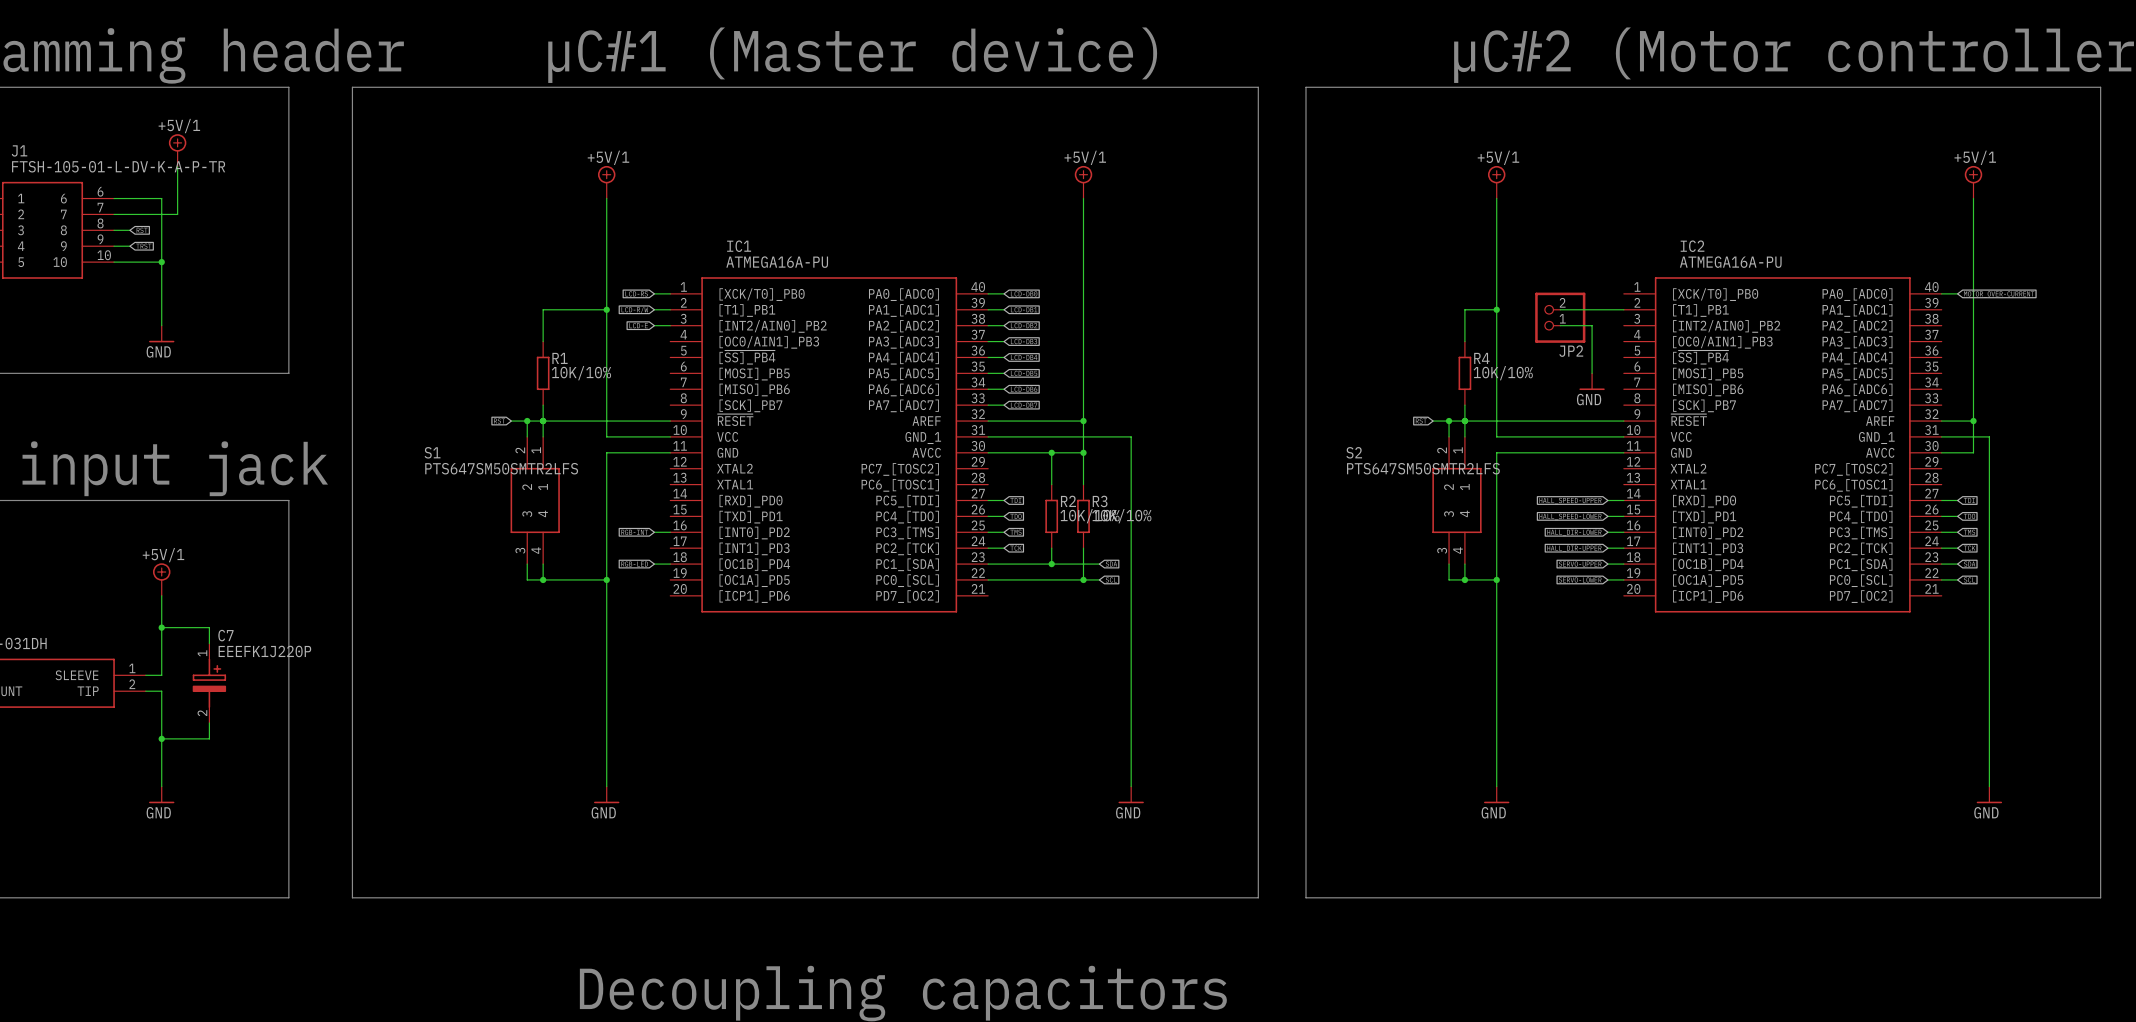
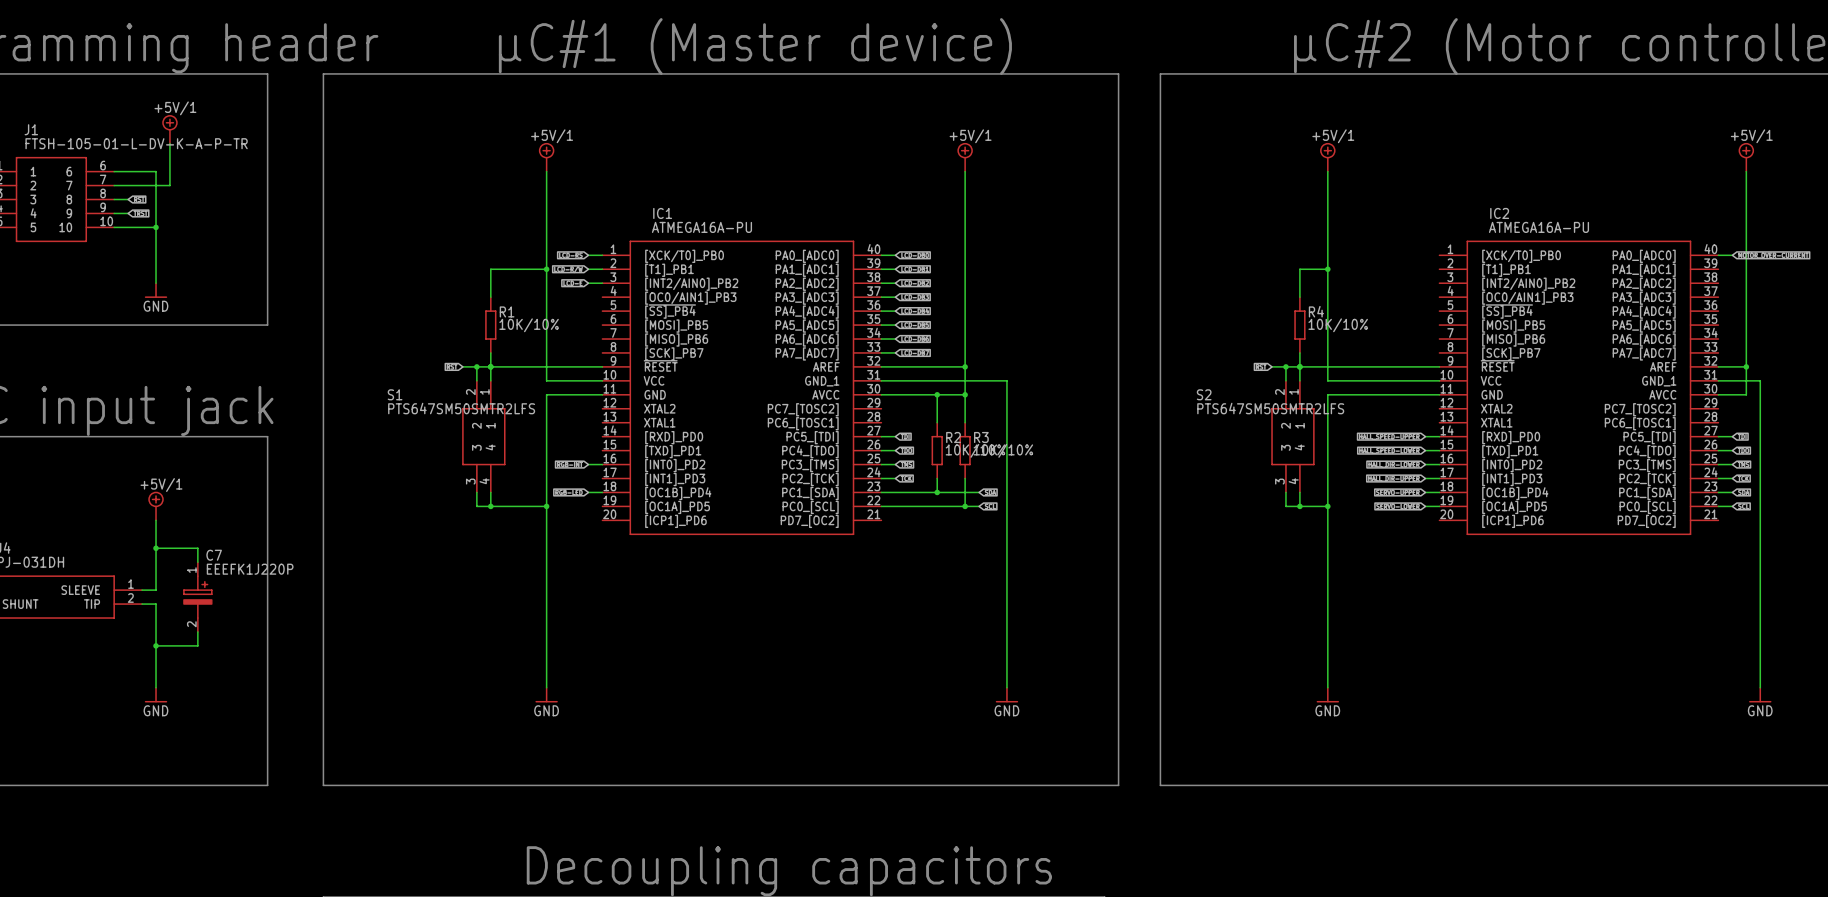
wire: (1560, 309) (1623, 309) -> none
JP2: (1560, 317) -> none
wire: (1560, 325) (1592, 325) (1592, 373) -> none
power symbol: GND (1592, 381) -> none

